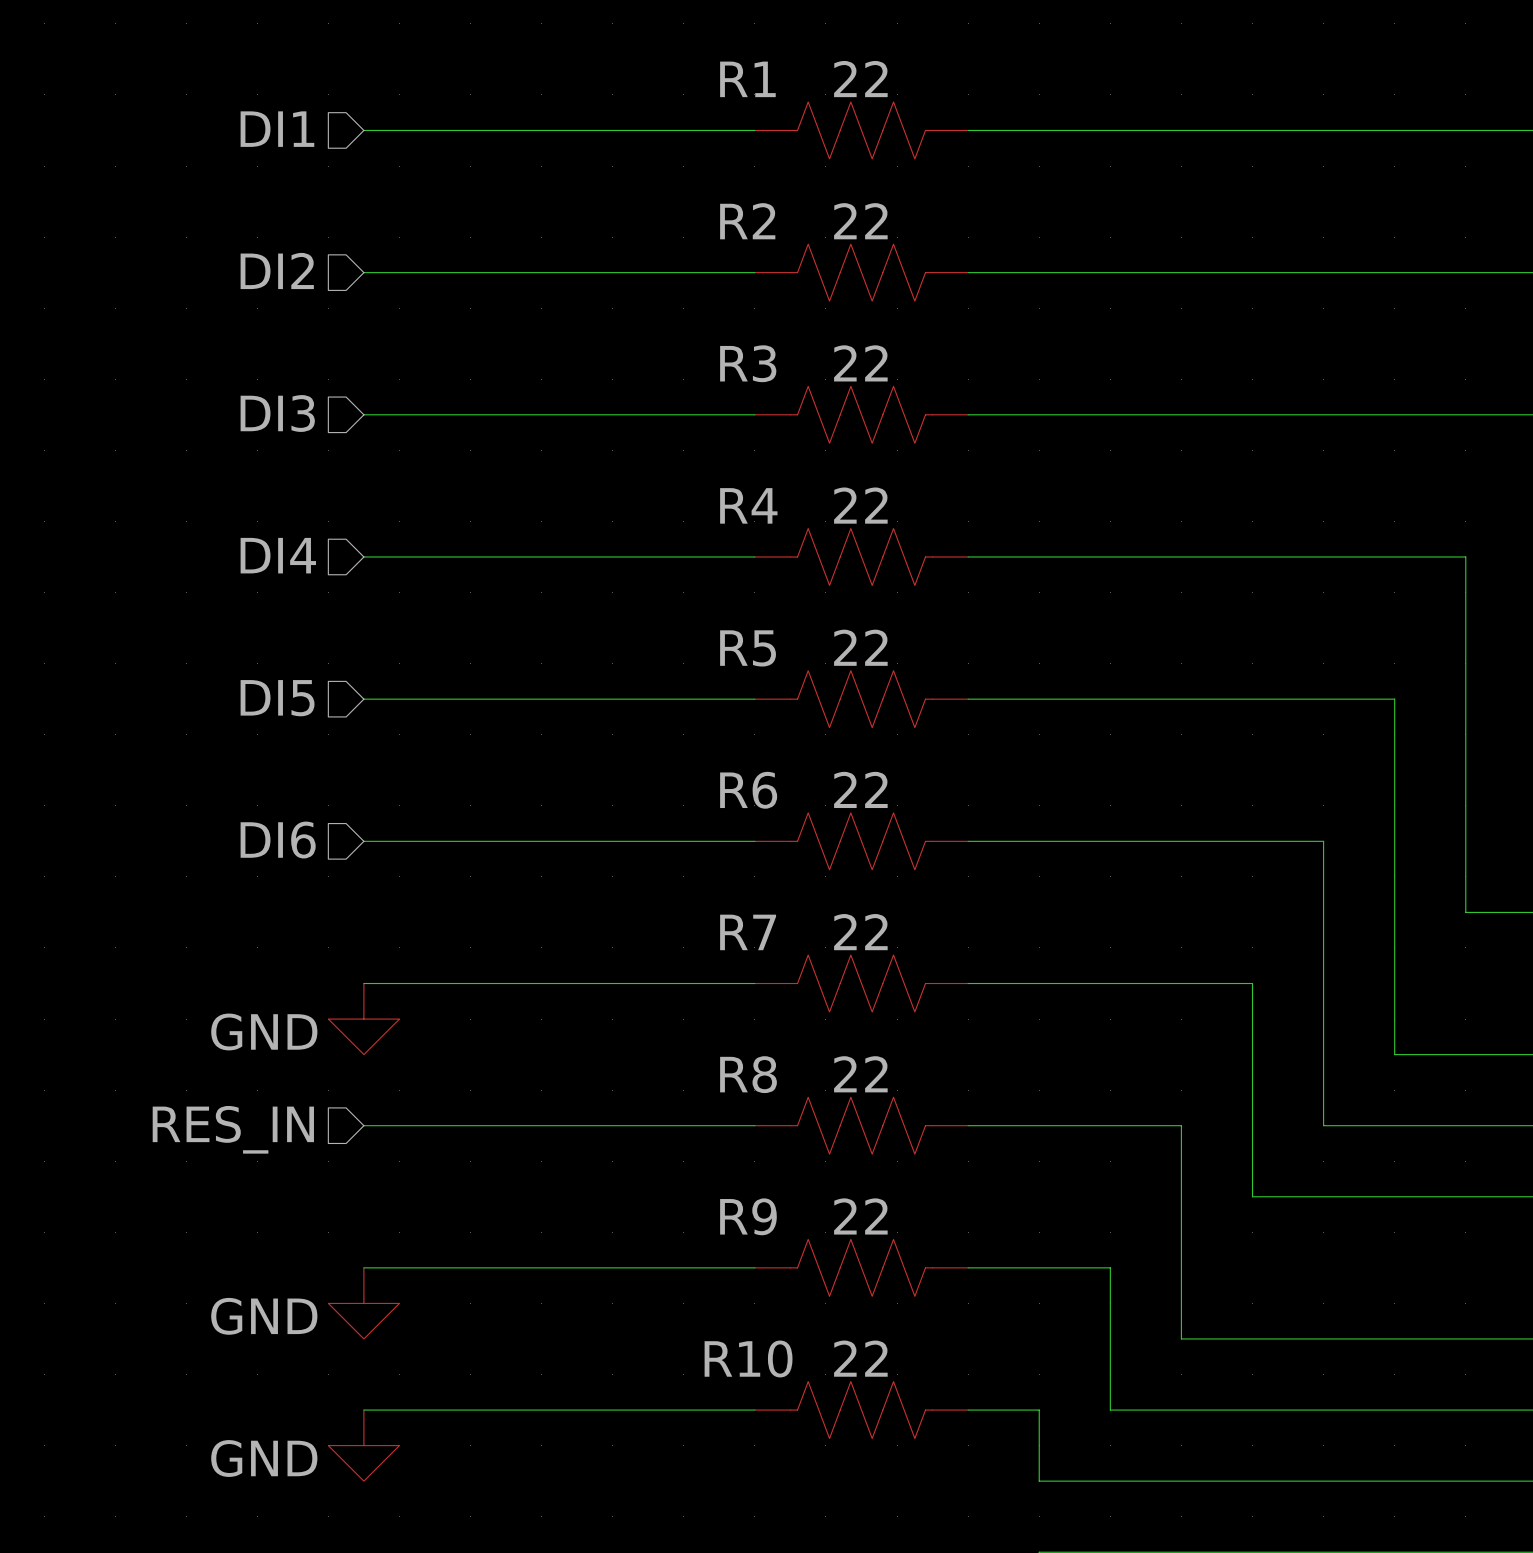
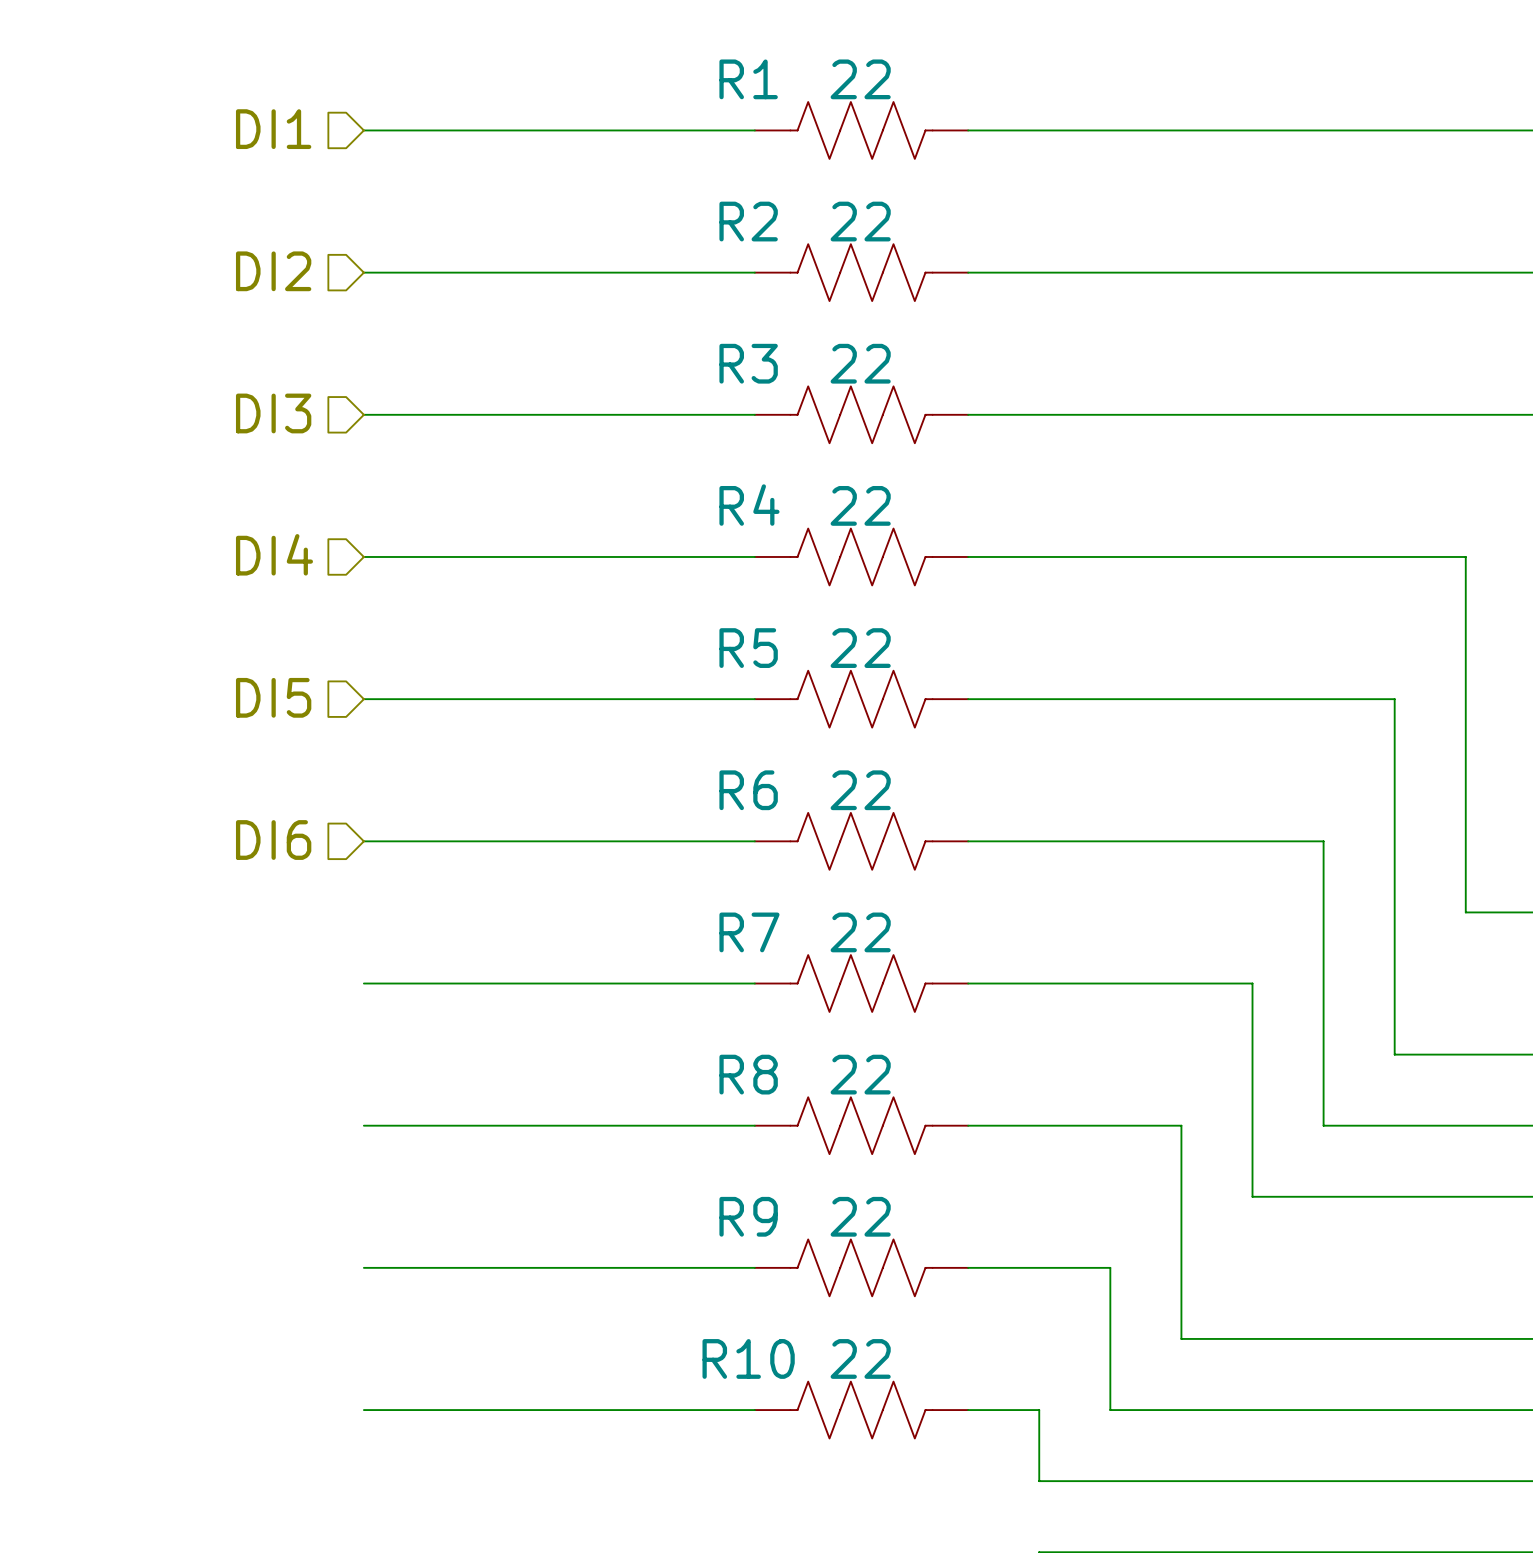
power symbol: GND (363, 1019) -> none
hierarchical label: RES_IN (233, 1129) -> none
power symbol: GND (363, 1303) -> none
power symbol: GND (363, 1445) -> none

